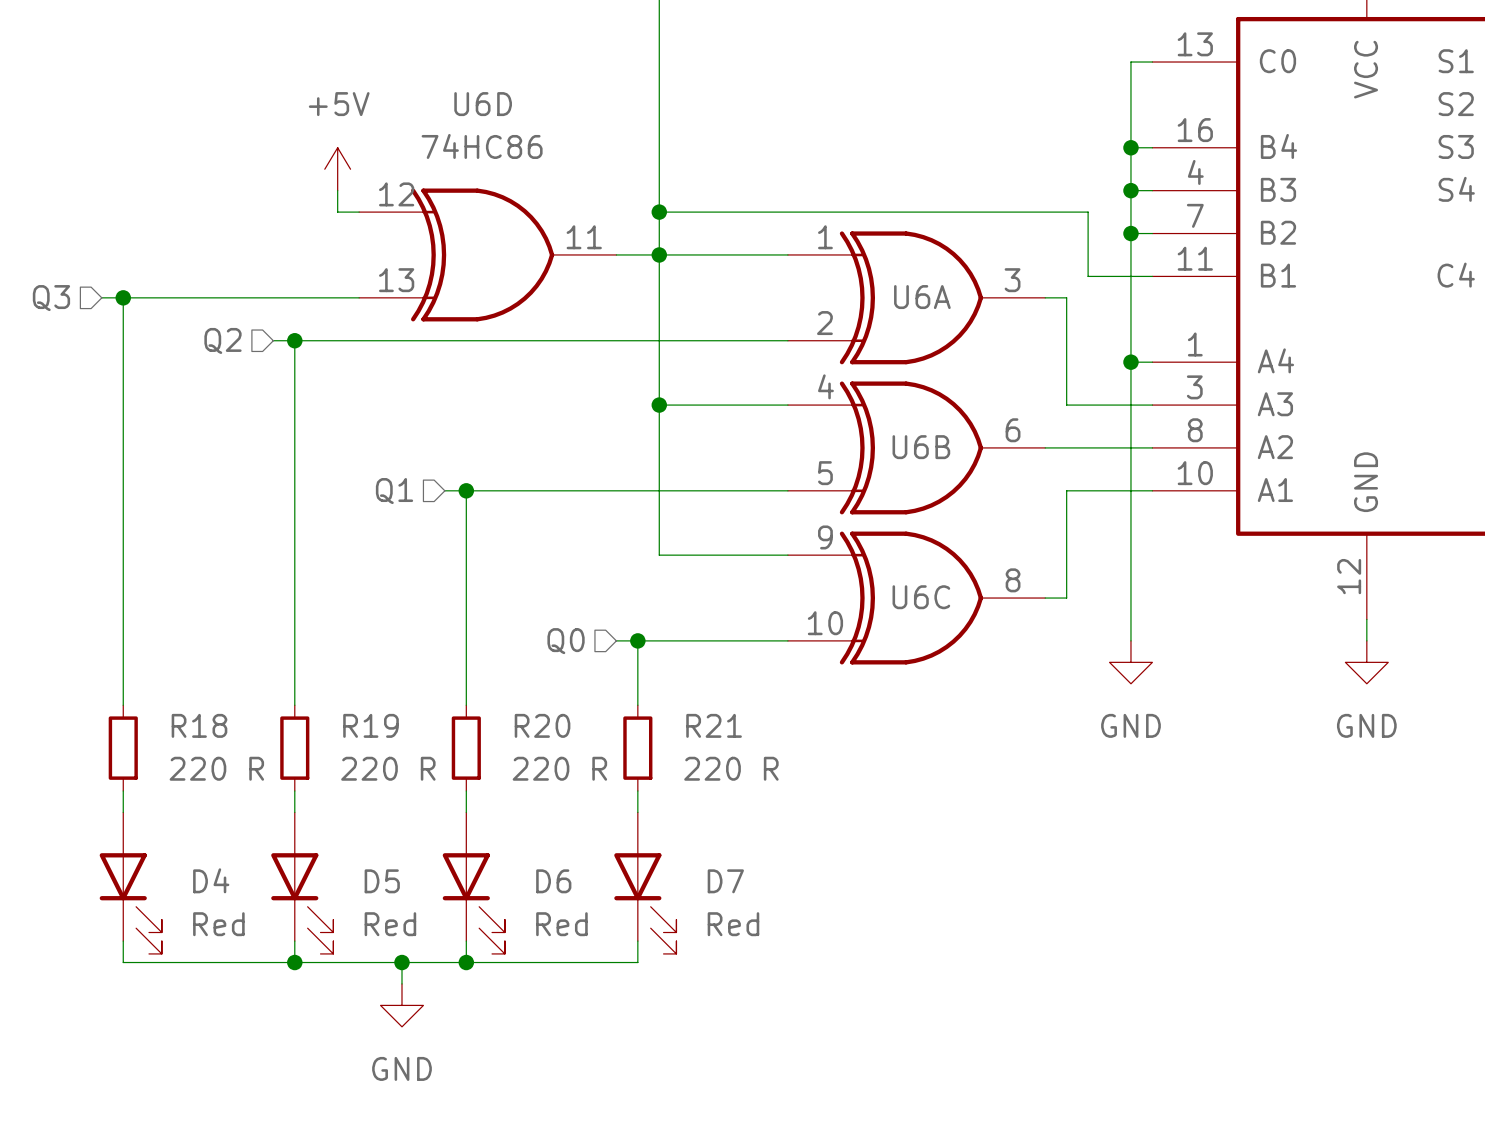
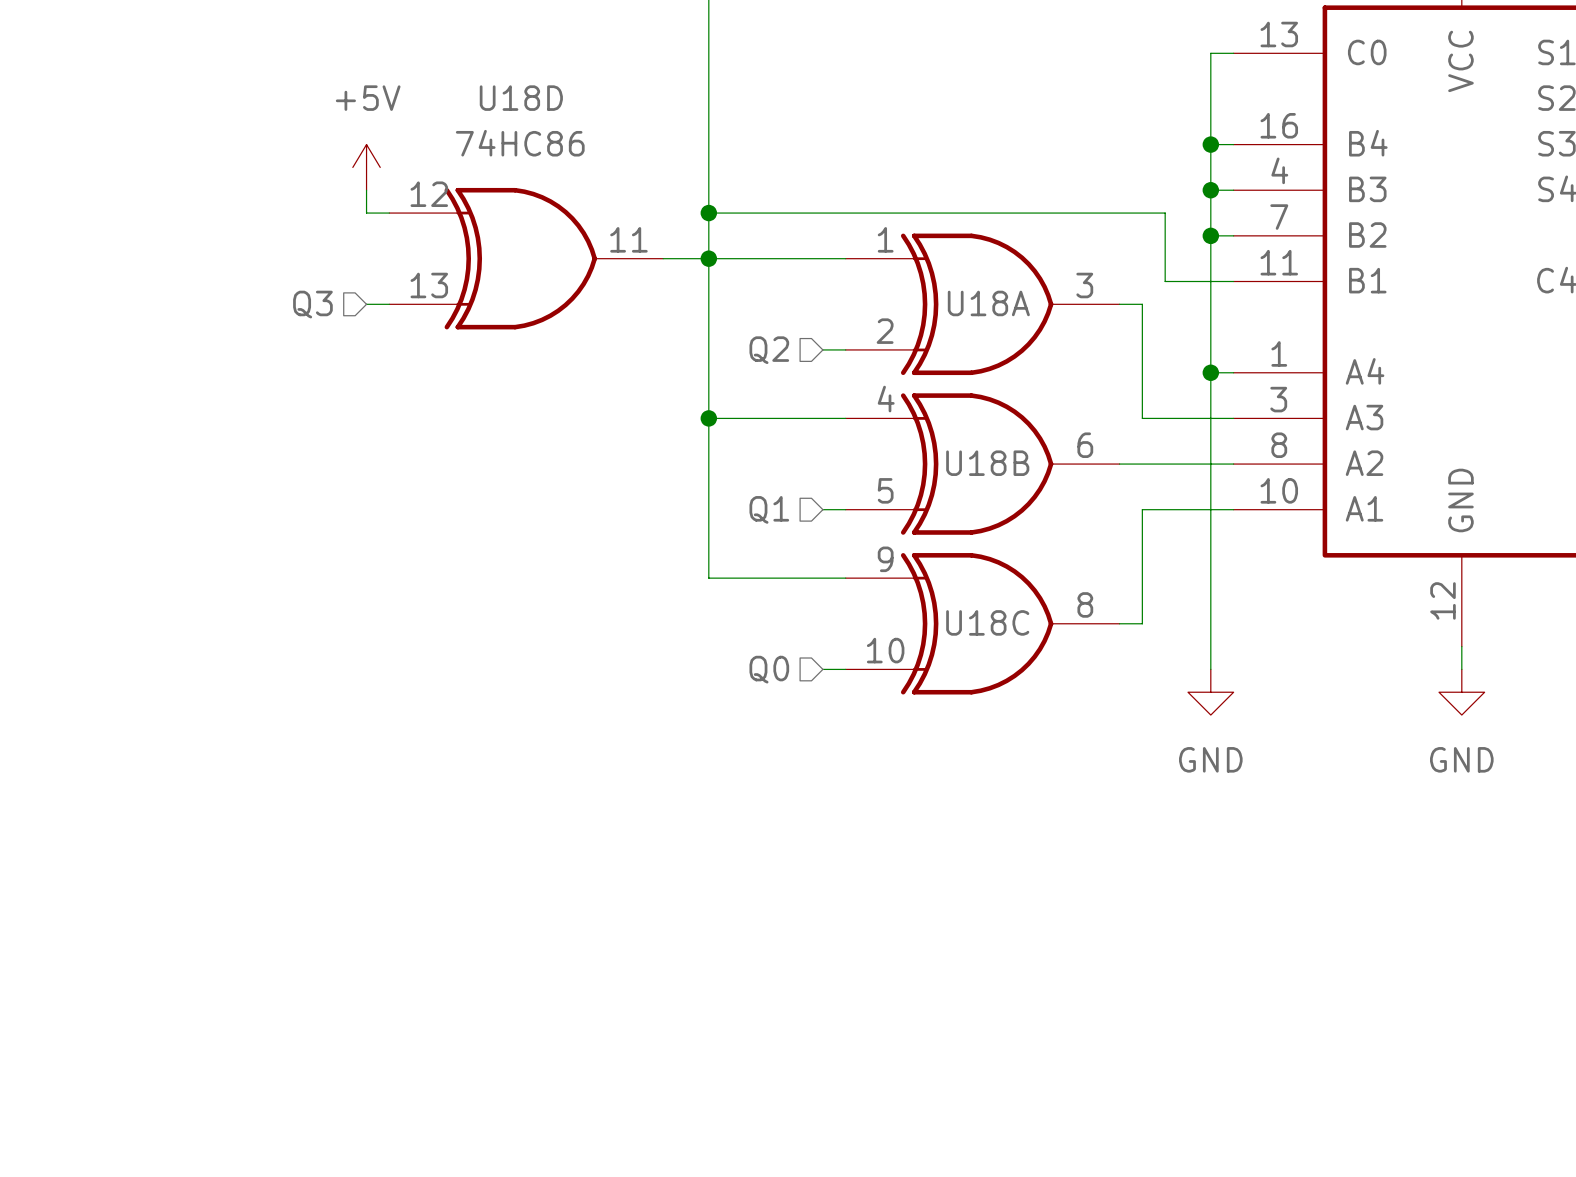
U6D name: U6D (483, 104) -> U18D (521, 98)
wire: (101, 297) (337, 297) -> none
wire: (123, 297) (123, 705) -> none
junction: (123, 297) -> none
U6A name: U6A (922, 297) -> U18A (988, 303)
hierarchical label position: Q3 (51, 298) -> Q3 (312, 304)
hierarchical label: Q2 (222, 340) -> none
wire: (273, 340) (766, 340) -> none
wire: (294, 340) (294, 705) -> none
junction: (294, 340) -> none
hierarchical label: none -> Q2 (769, 350)
U6B name: U6B (921, 447) -> U18B (987, 463)
wire: (444, 490) (766, 490) -> none
wire: (466, 490) (466, 705) -> none
junction: (466, 490) -> none
hierarchical label position: Q1 (394, 491) -> Q1 (769, 509)
U6C name: U6C (921, 597) -> U18C (987, 622)
wire: (616, 640) (766, 640) -> none
wire: (637, 640) (637, 705) -> none
junction: (637, 640) -> none
hierarchical label position: Q0 (566, 641) -> Q0 (769, 669)
R18: 220 R (123, 748) -> none
R19: 220 R (294, 748) -> none
R20: 220 R (466, 748) -> none
R21: 220 R (637, 748) -> none
wire: (123, 790) (123, 812) -> none
wire: (294, 790) (294, 812) -> none
wire: (466, 790) (466, 812) -> none
wire: (637, 790) (637, 812) -> none
D4: Red (130, 883) -> none
D5: Red (302, 883) -> none
D6: Red (473, 883) -> none
D7: Red (645, 883) -> none
wire: (123, 941) (123, 962) (637, 962) (637, 941) -> none
wire: (294, 941) (294, 962) -> none
wire: (466, 941) (466, 962) -> none
junction: (294, 962) -> none
wire: (401, 962) (401, 983) -> none
junction: (401, 962) -> none
junction: (466, 962) -> none
power symbol: GND (401, 1005) -> none

